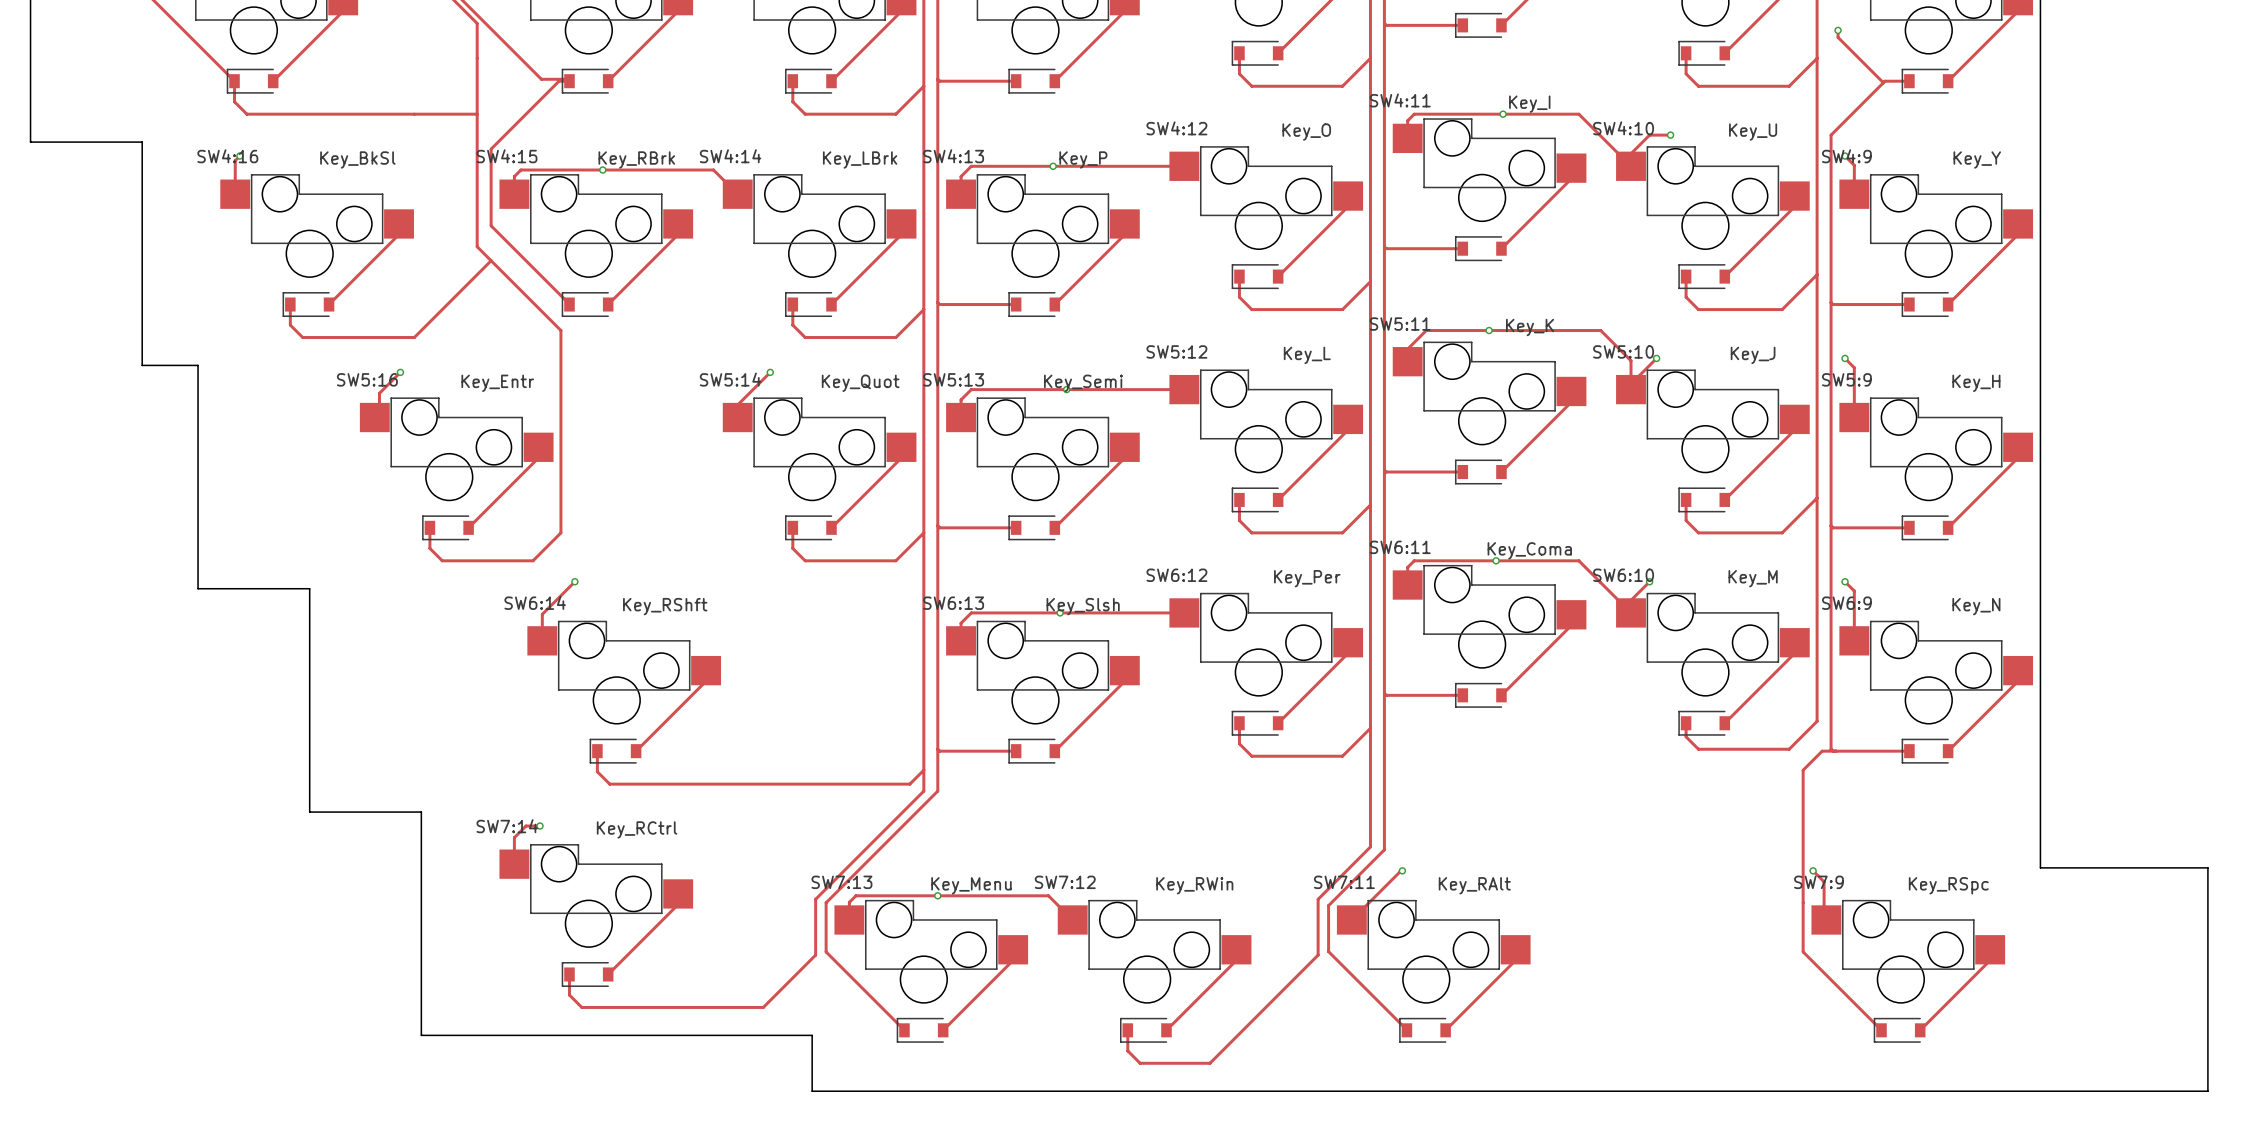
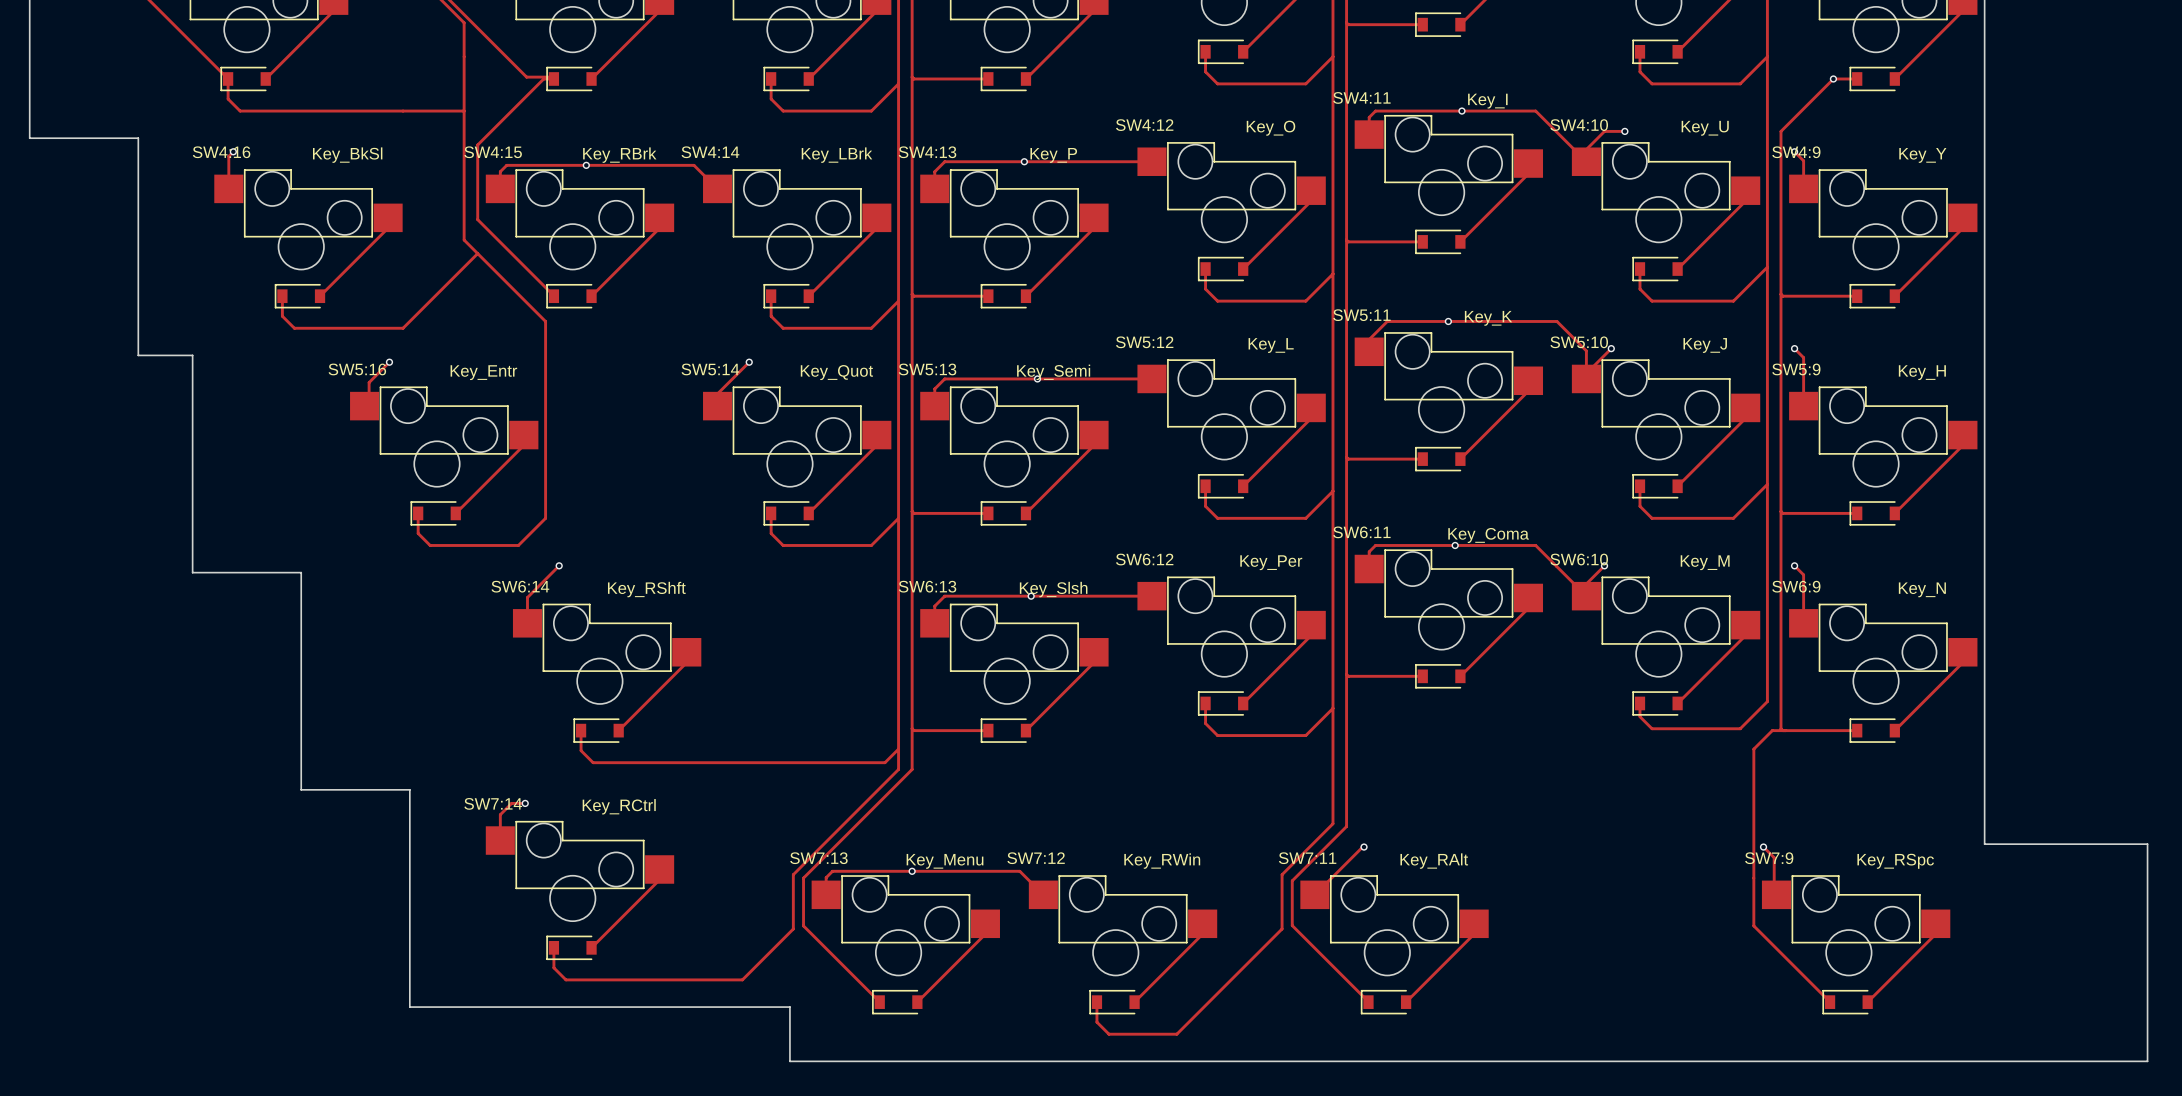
track: (1838, 30) (1838, 37) (1883, 82) -> none
via position: (1838, 30) -> (1833, 78)

